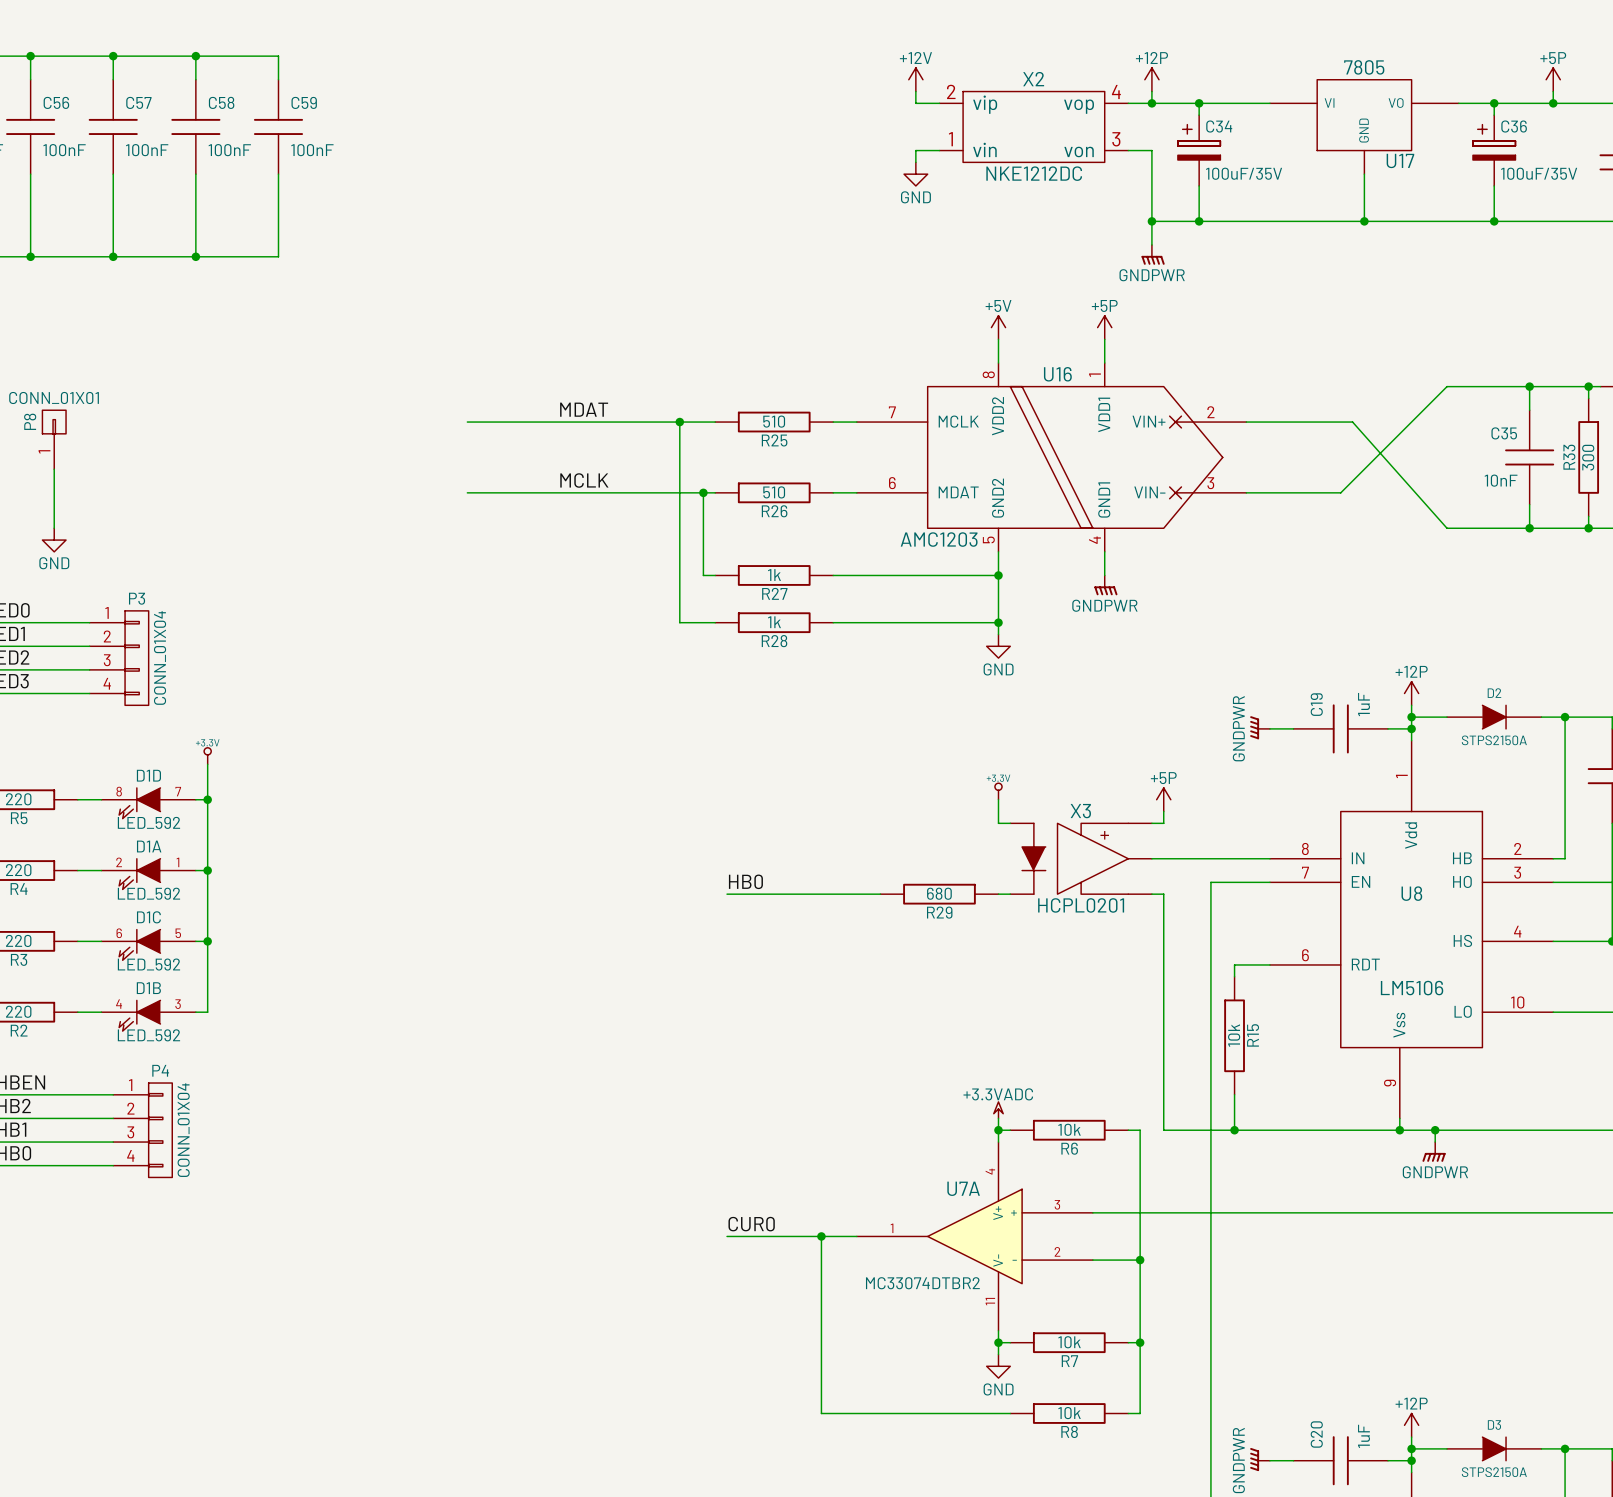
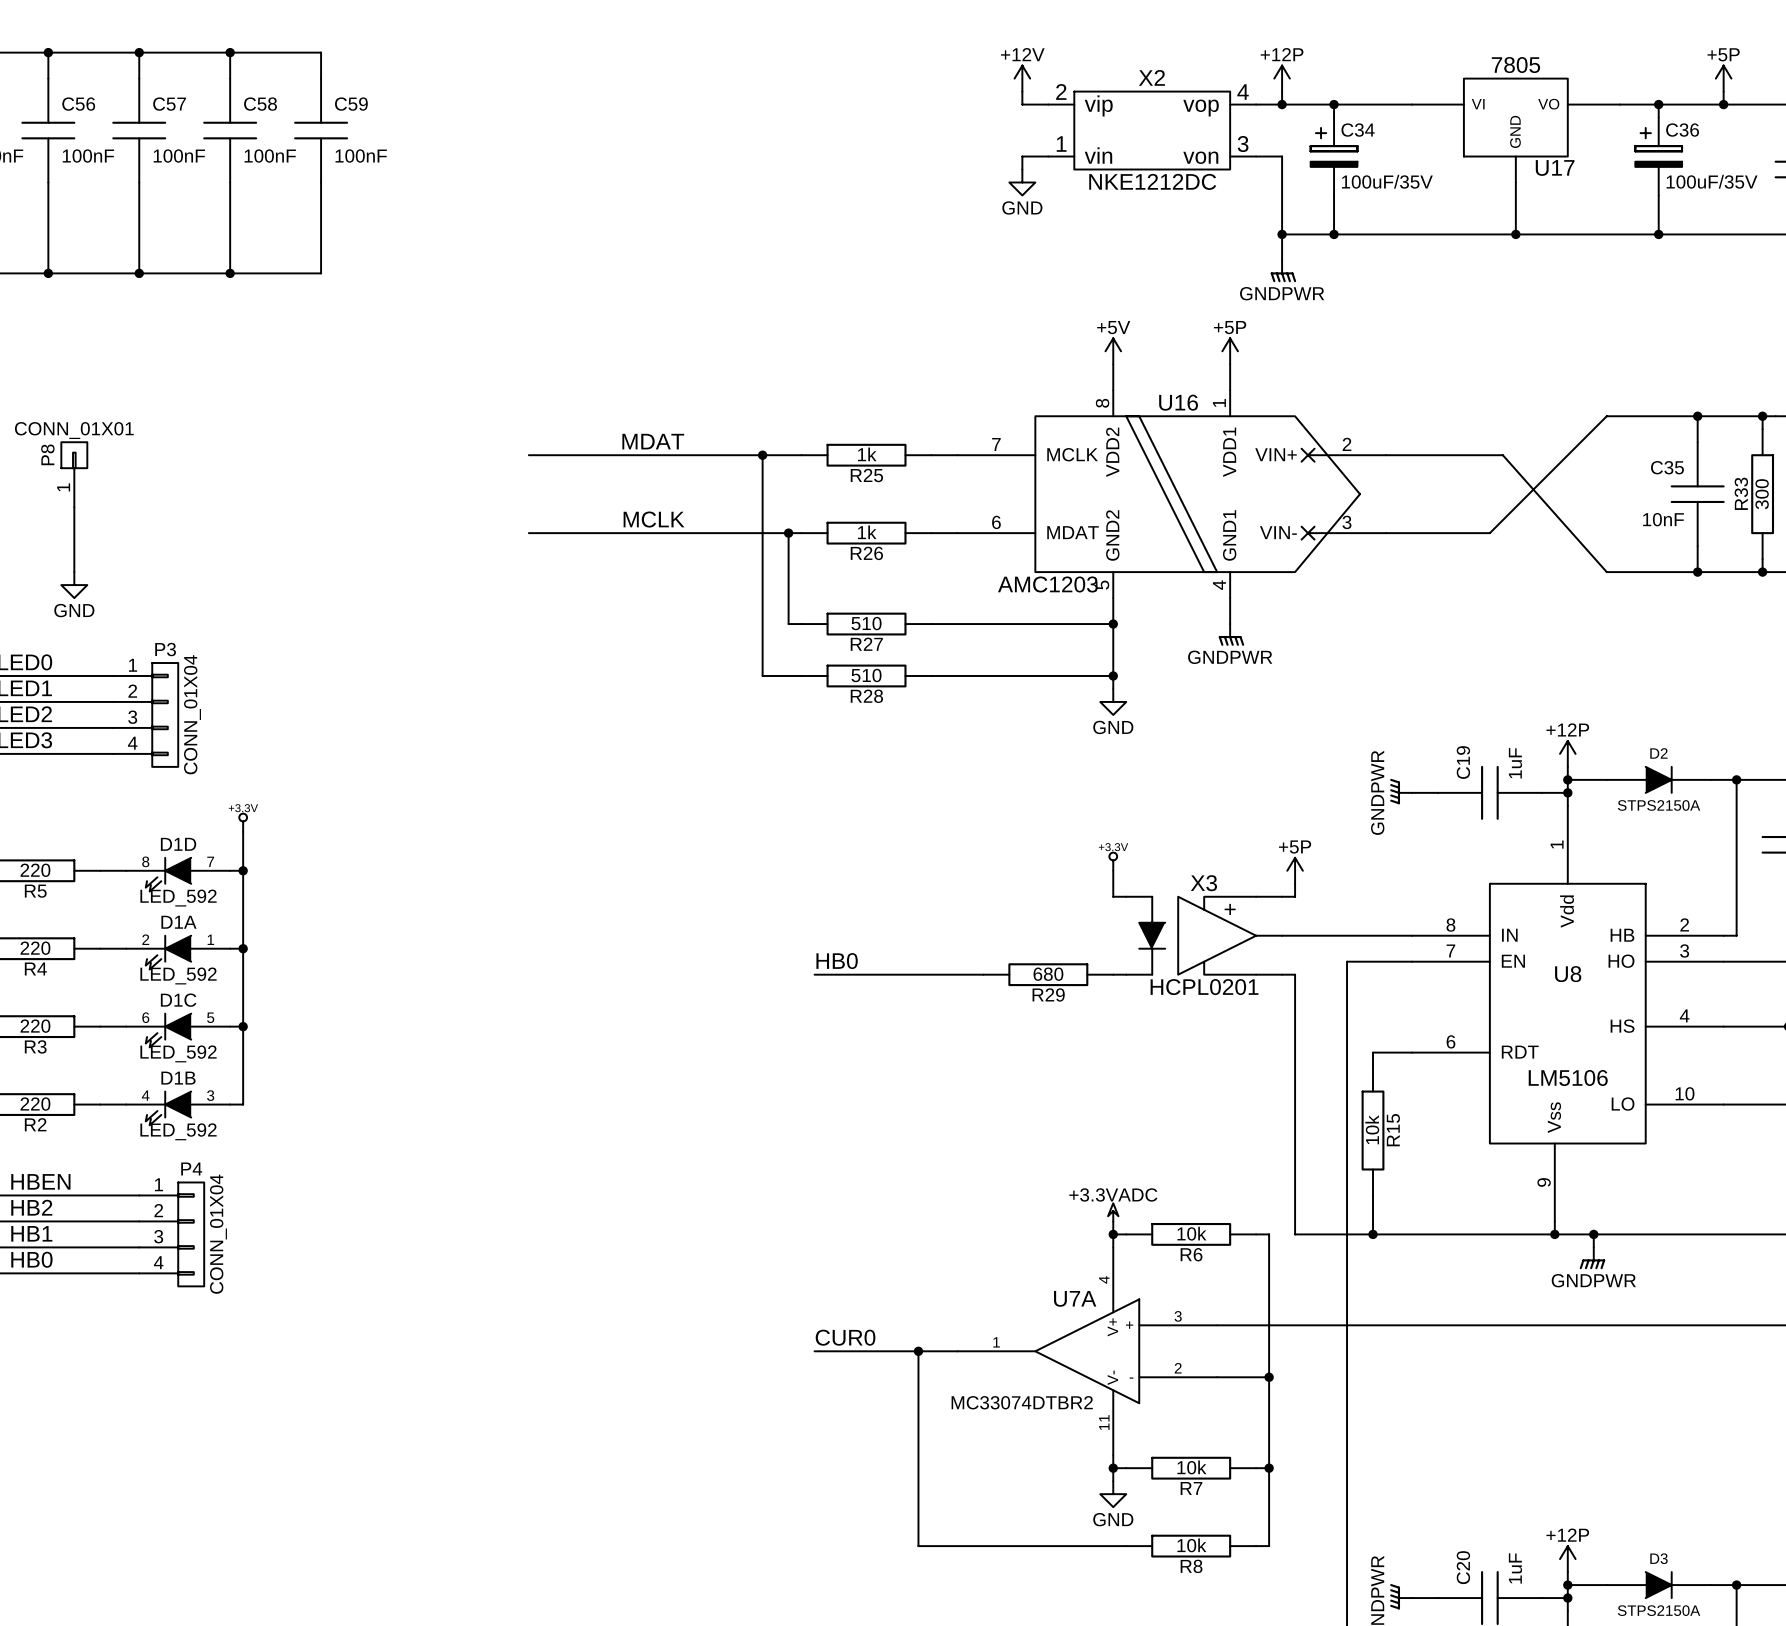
R25 value: 510 (774, 421) -> 1k (867, 454)
R26 value: 510 (774, 492) -> 1k (867, 532)
R27 value: 1k (774, 575) -> 510 (866, 623)
R28 value: 1k (774, 622) -> 510 (866, 675)

